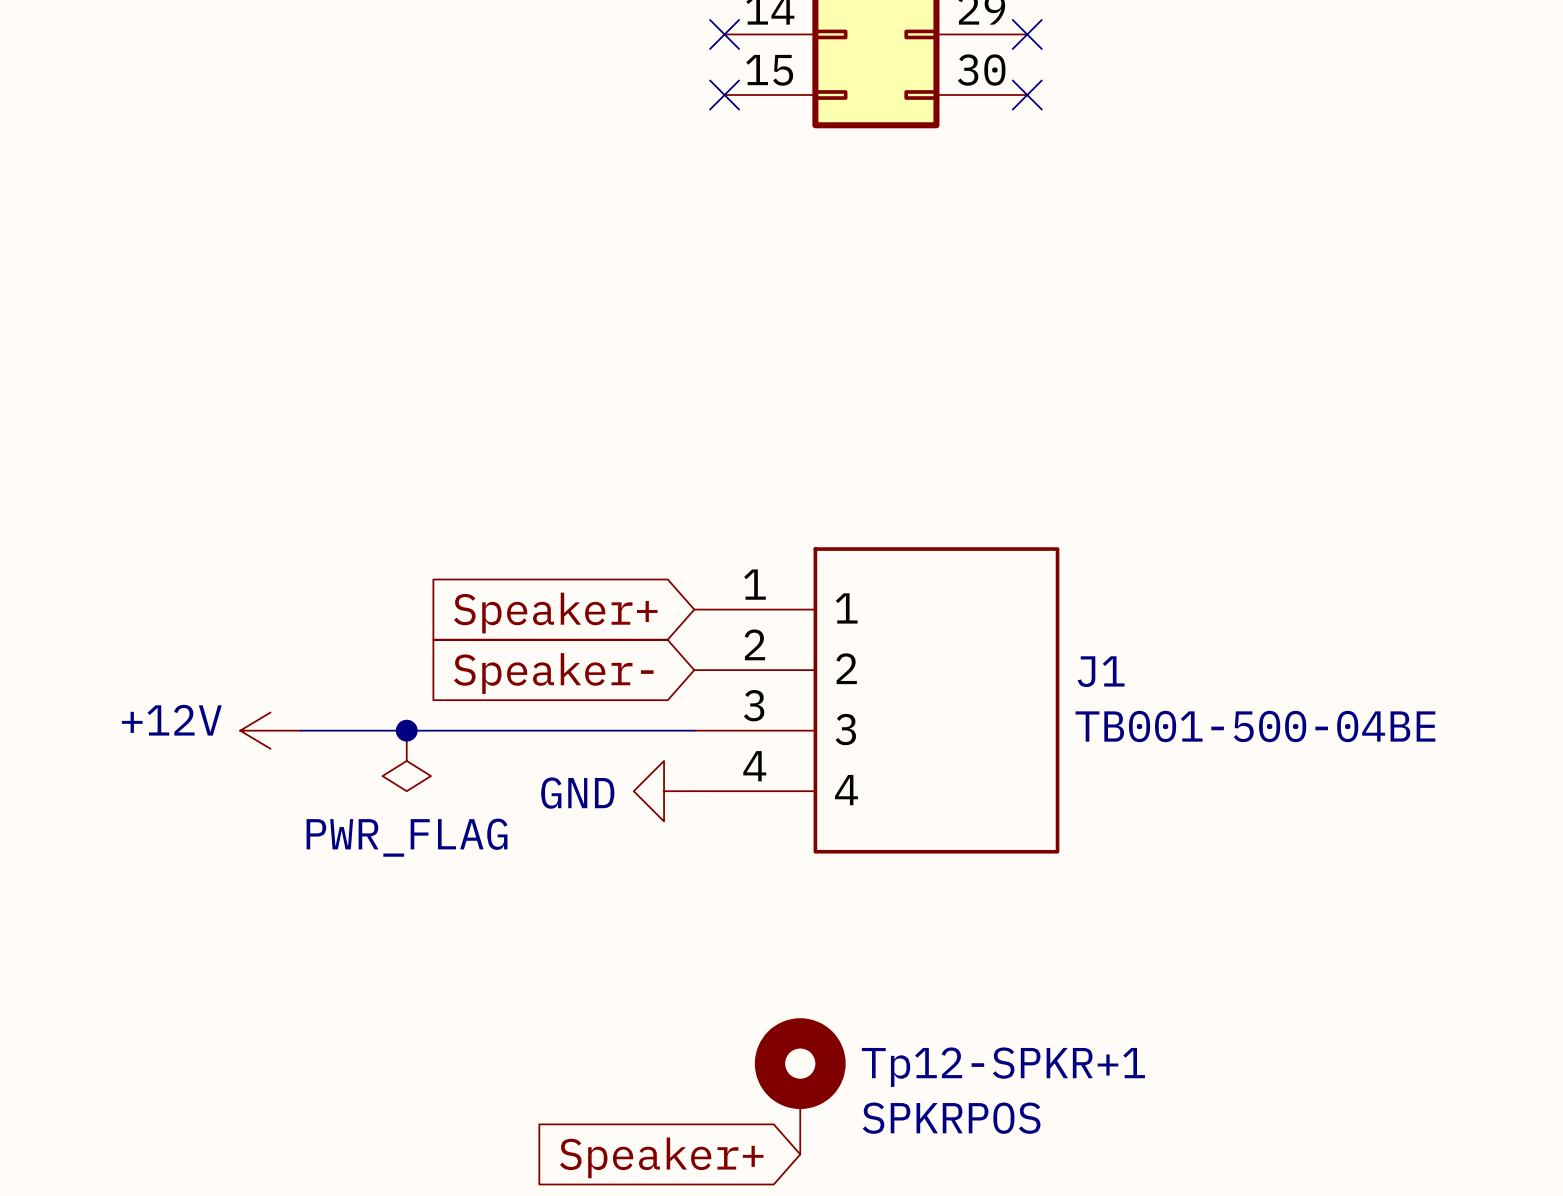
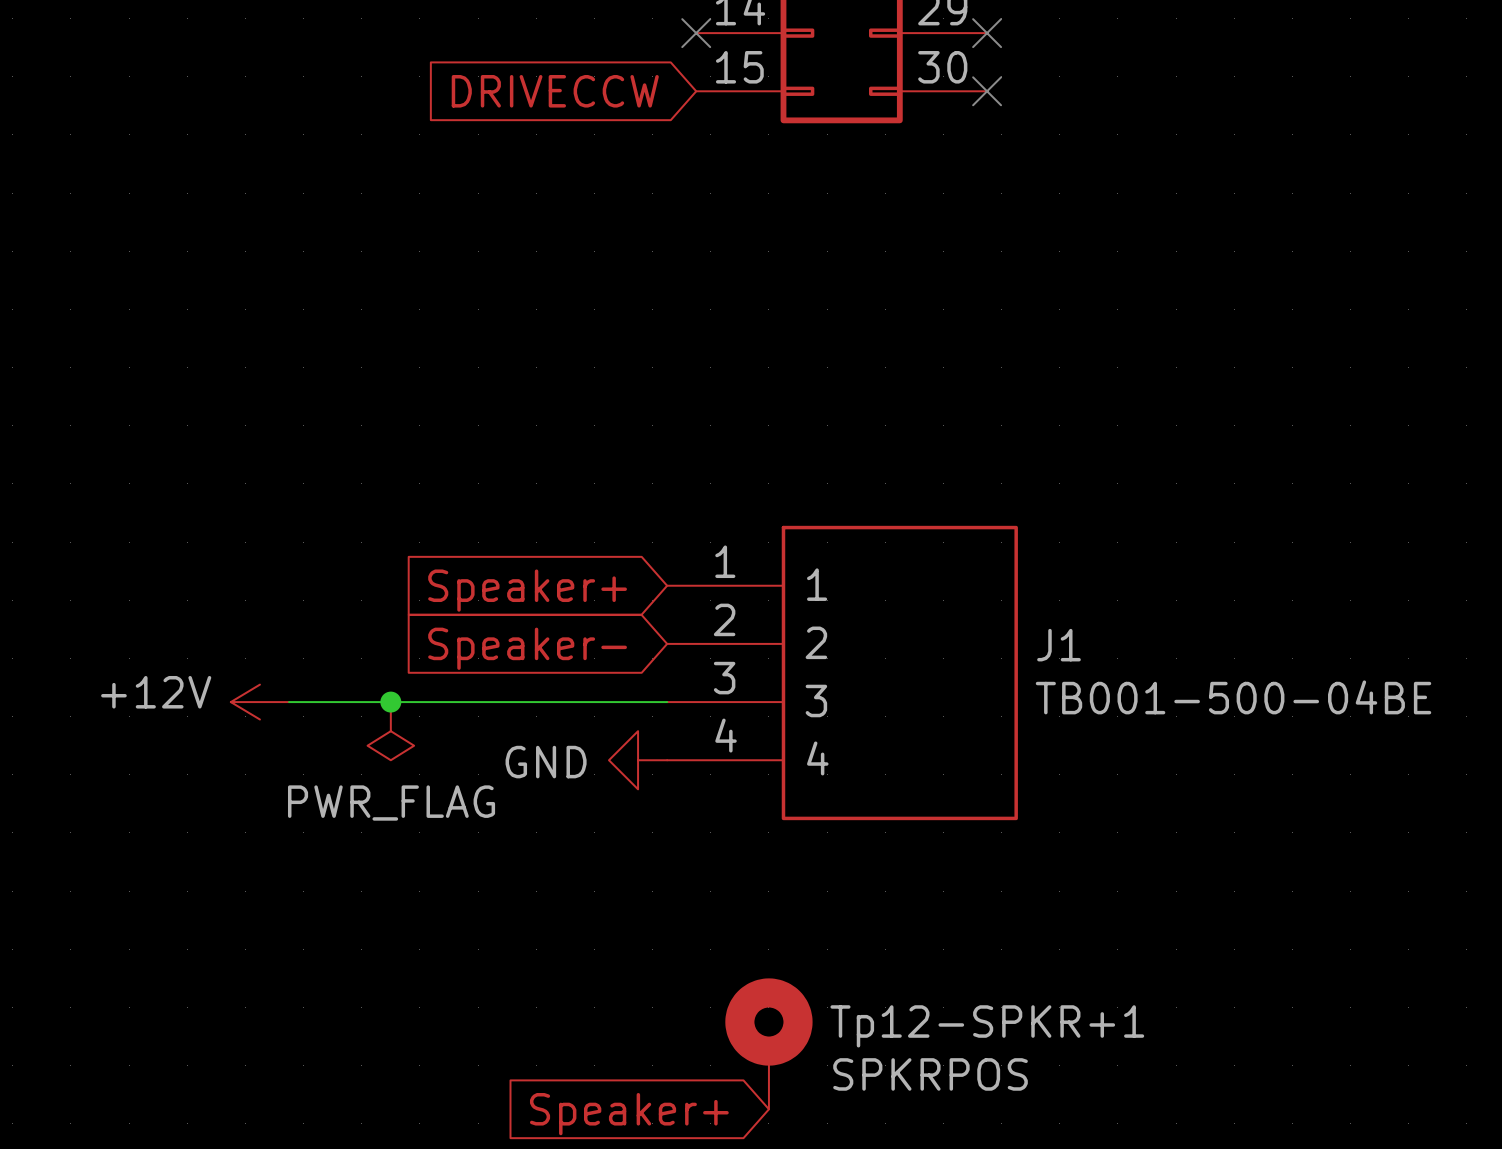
global label: none -> DRIVECCW (555, 91)
no-connect mark: (724, 95) -> none

